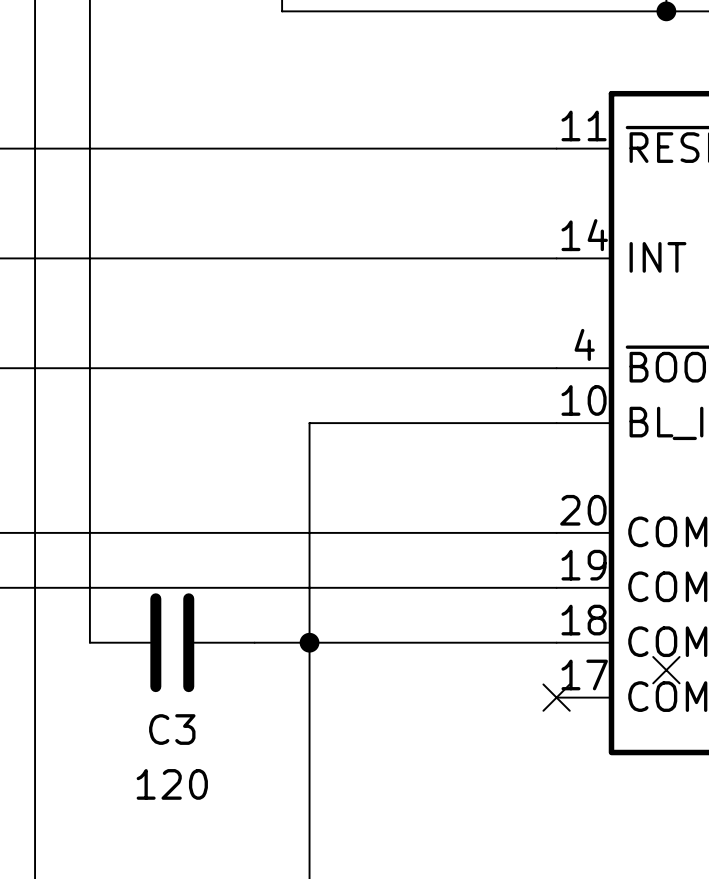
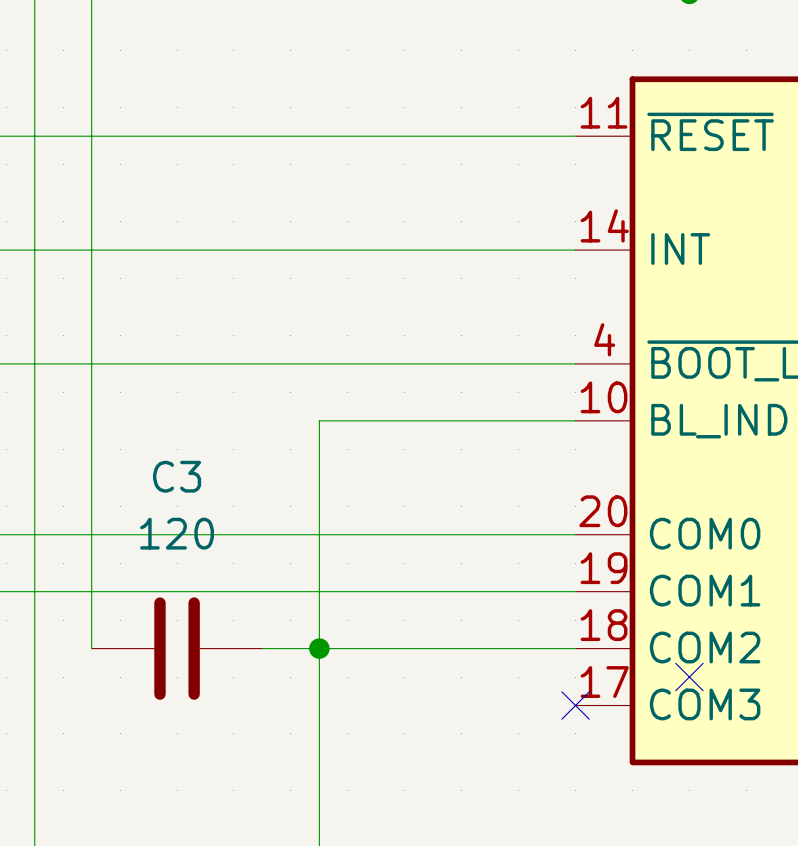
C3 name position: C3 (172, 729) -> C3 (177, 476)
C3 value position: 120 (172, 784) -> 120 (177, 533)

